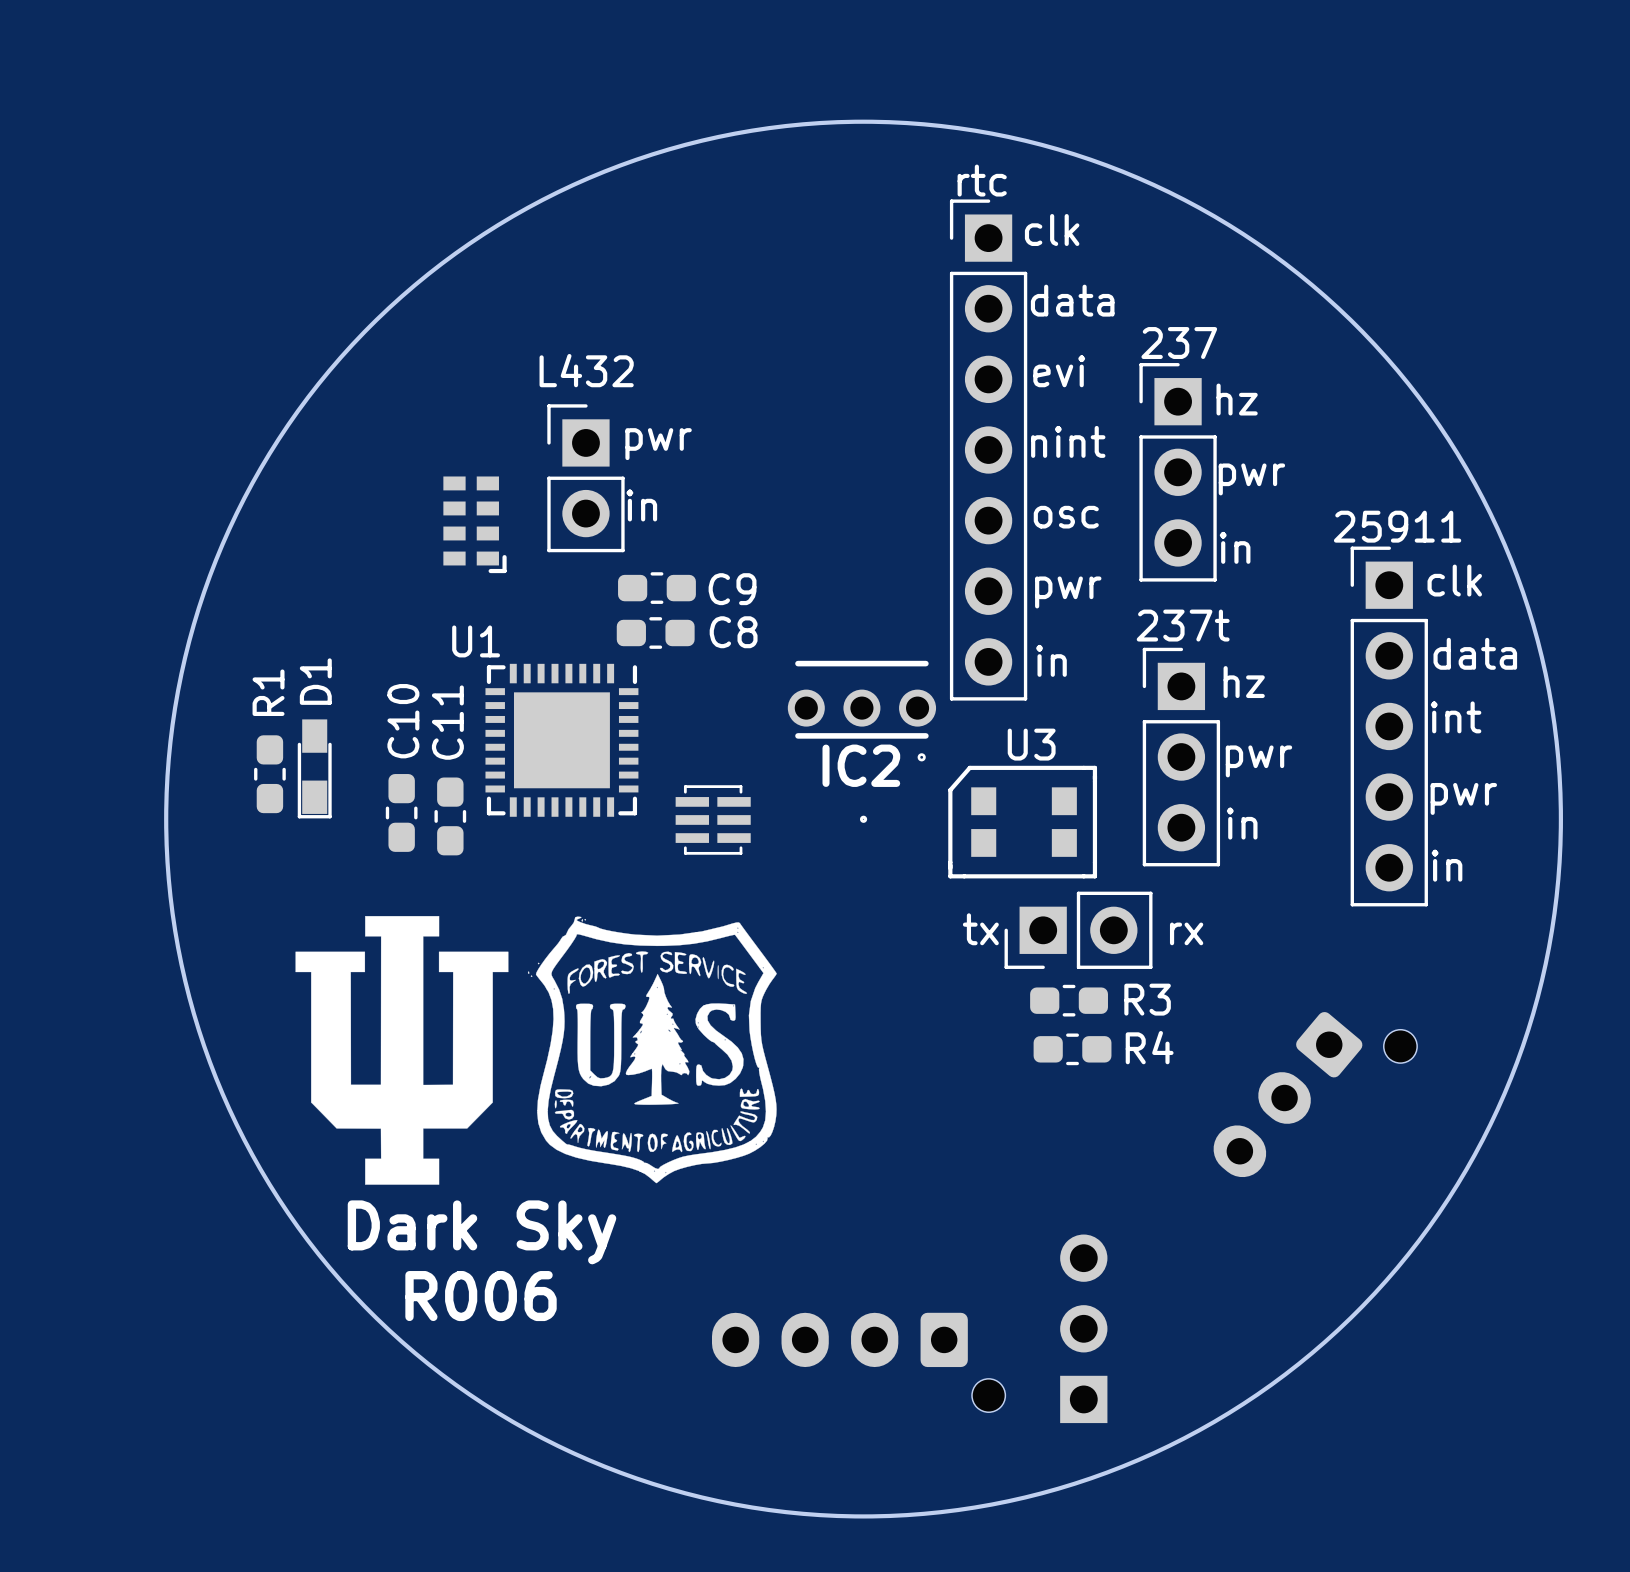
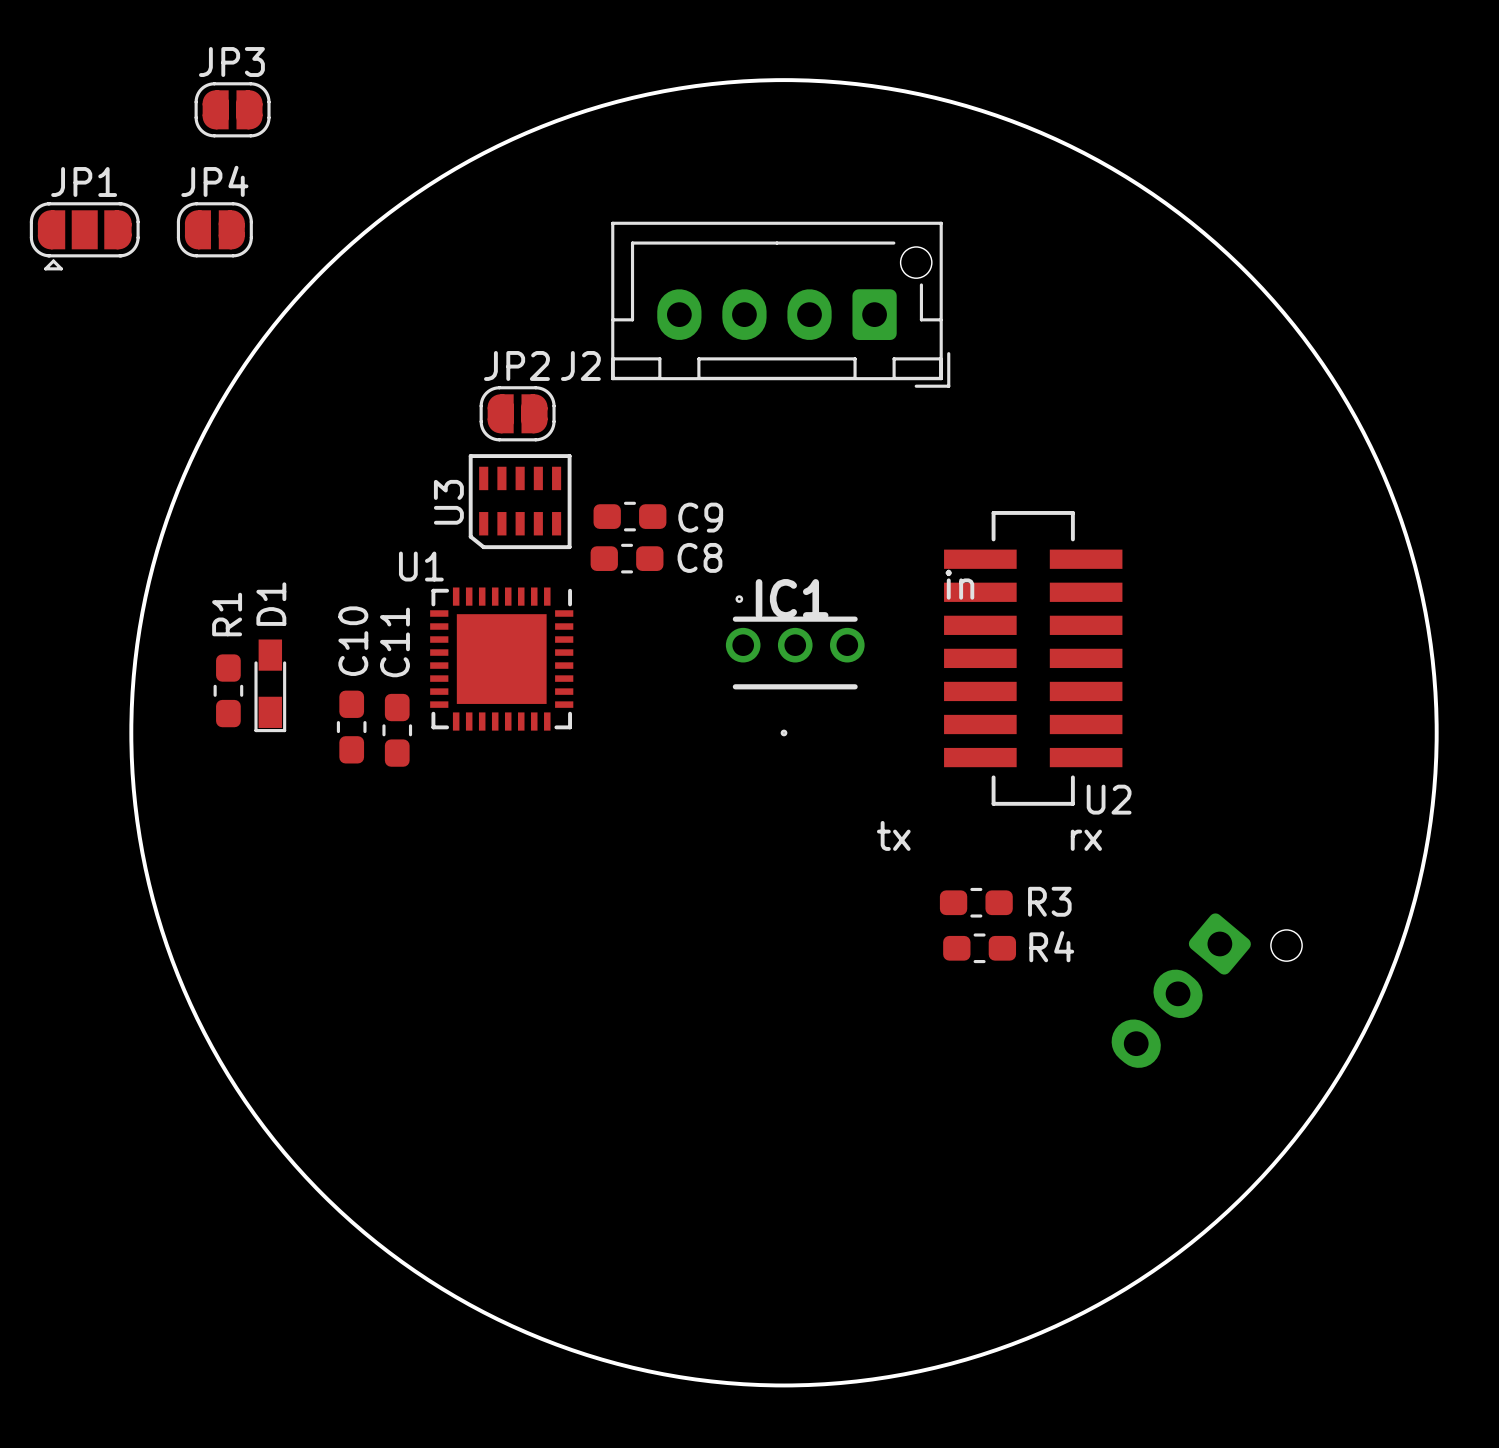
JP3: none -> (232, 109)
text: rtc (982, 180) -> none
text: clk (1052, 230) -> none
JP4: none -> (214, 229)
JP1: none -> (84, 236)
text: data (1072, 300) -> none
text: 237 (1179, 343) -> none
J2: none -> (780, 304)
text: L432 (586, 370) -> none
text: evi (1059, 371) -> none
text: hz (1237, 399) -> none
text: nint (1068, 441) -> none
text: pwr (658, 444) -> none
part: (988, 450) -> none
part: (1178, 472) -> none
JP2: none -> (517, 413)
part: (585, 478) -> none
text: pwr (1251, 479) -> none
text: in (641, 505) -> none
text: osc (1066, 517) -> none
part: (475, 524) -> none
text: 25911 (1397, 526) -> none
text: in (1235, 547) -> none
text: clk (1454, 580) -> none
C9 position: (656, 588) -> (629, 516)
text: pwr (1068, 592) -> none
text: 237t (1183, 625) -> none
C8 position: (655, 632) -> (627, 558)
text: data (1475, 653) -> none
text: hz (1244, 682) -> none
IC2: (861, 711) -> none
text: int (1456, 717) -> none
IC1: none -> (795, 642)
part: (1389, 726) -> none
U2: none -> (1033, 658)
U3 name position: U3 (1031, 744) -> U3 (448, 502)
part: (1181, 757) -> none
text: pwr (1258, 761) -> none
U3 footprint: [948, 765, 1098, 879] -> [468, 454, 572, 550]
text: pwr (1463, 798) -> none
part: (713, 819) -> none
text: in (1242, 823) -> none
text: in (1447, 865) -> none
drawing: [295, 916, 777, 1185] -> none
part: (1078, 930) -> none
text: Dark Sky (482, 1232) -> none
text: R006 (481, 1296) -> none
part: (1083, 1328) -> none
part: (858, 1362) -> none

